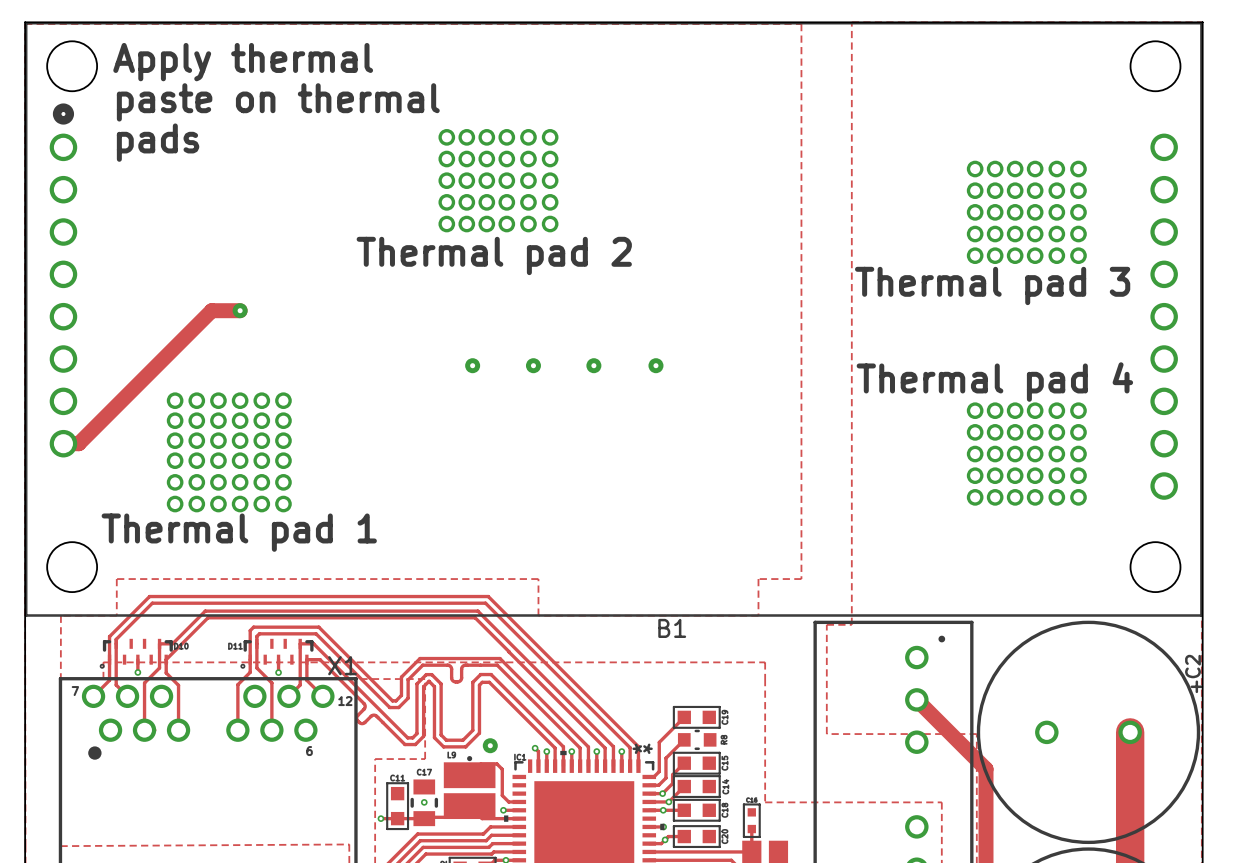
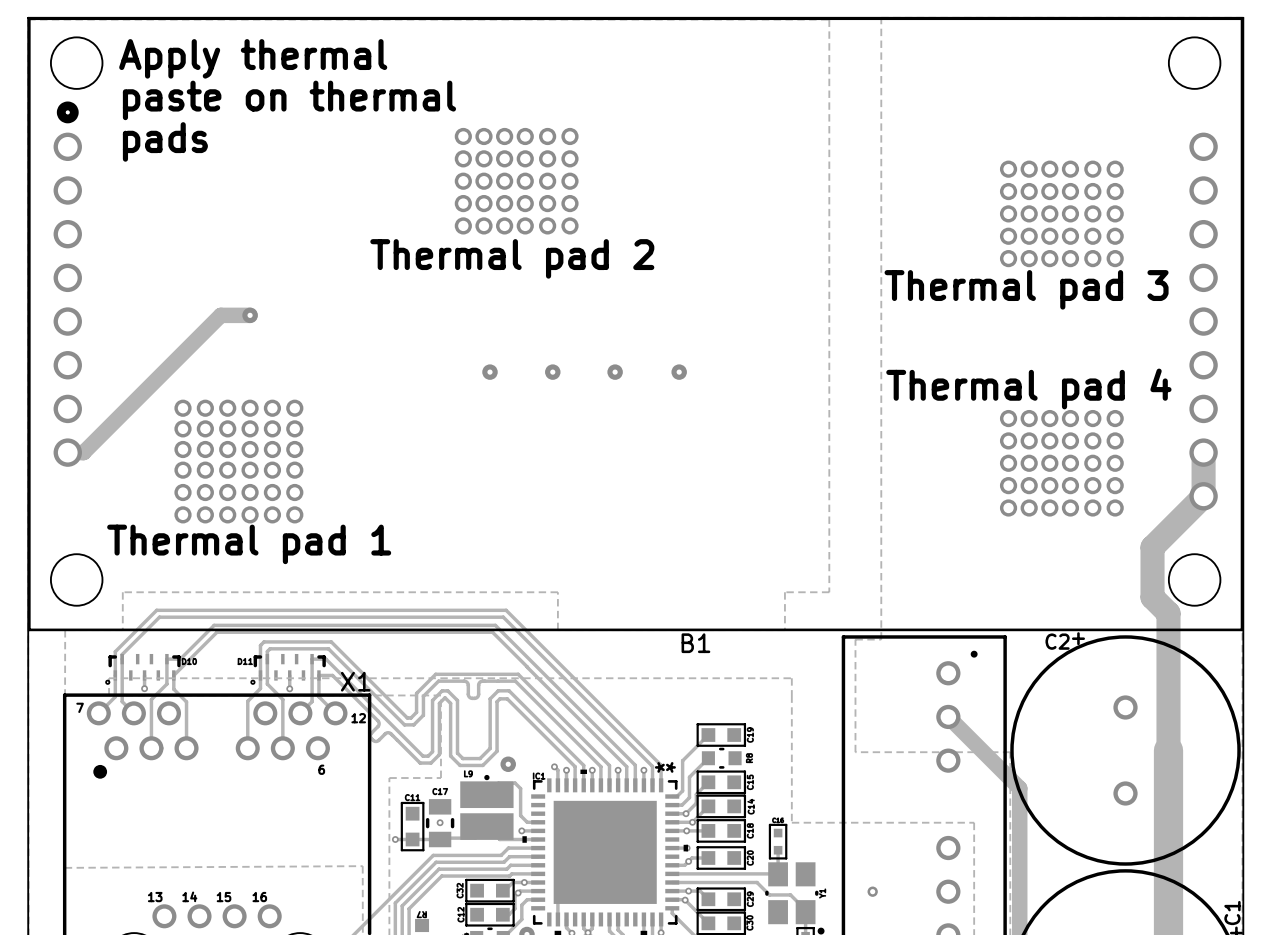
track: none -> (1203, 452) (1203, 496) (1152, 547) (1152, 597) (1168, 613) (1168, 750)
C2 rotation: 0° (1088, 732) -> 90° counterclockwise (1125, 750)

